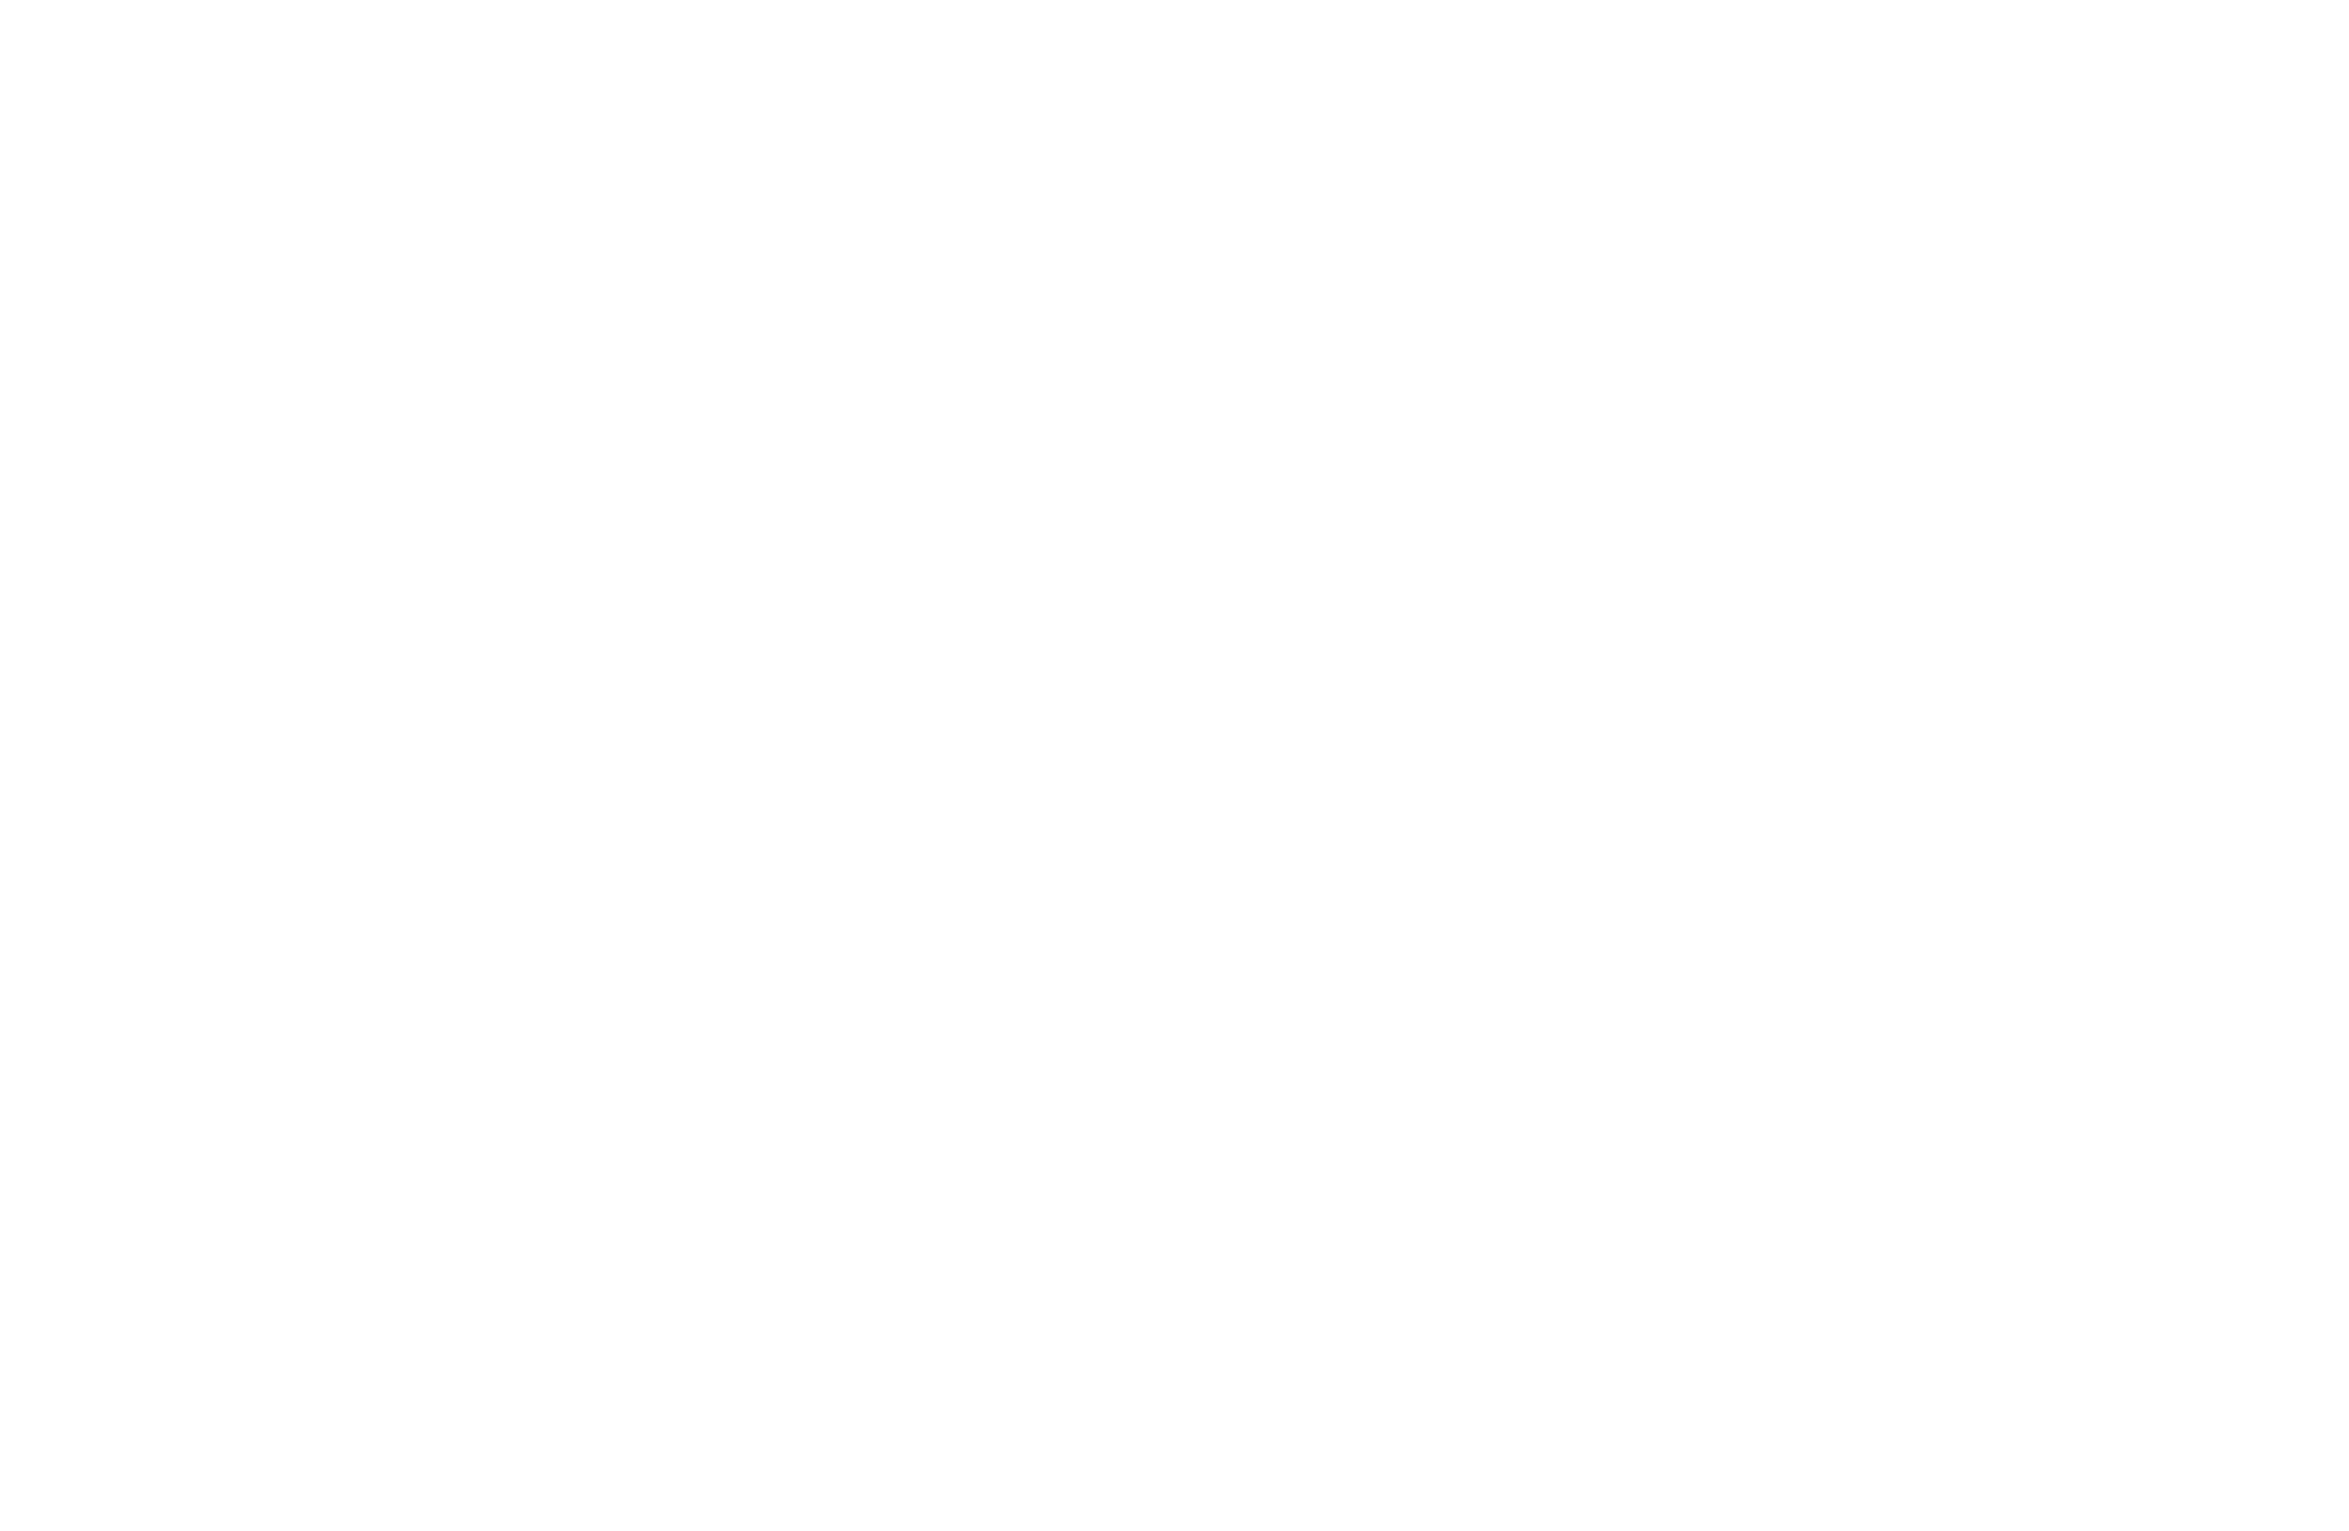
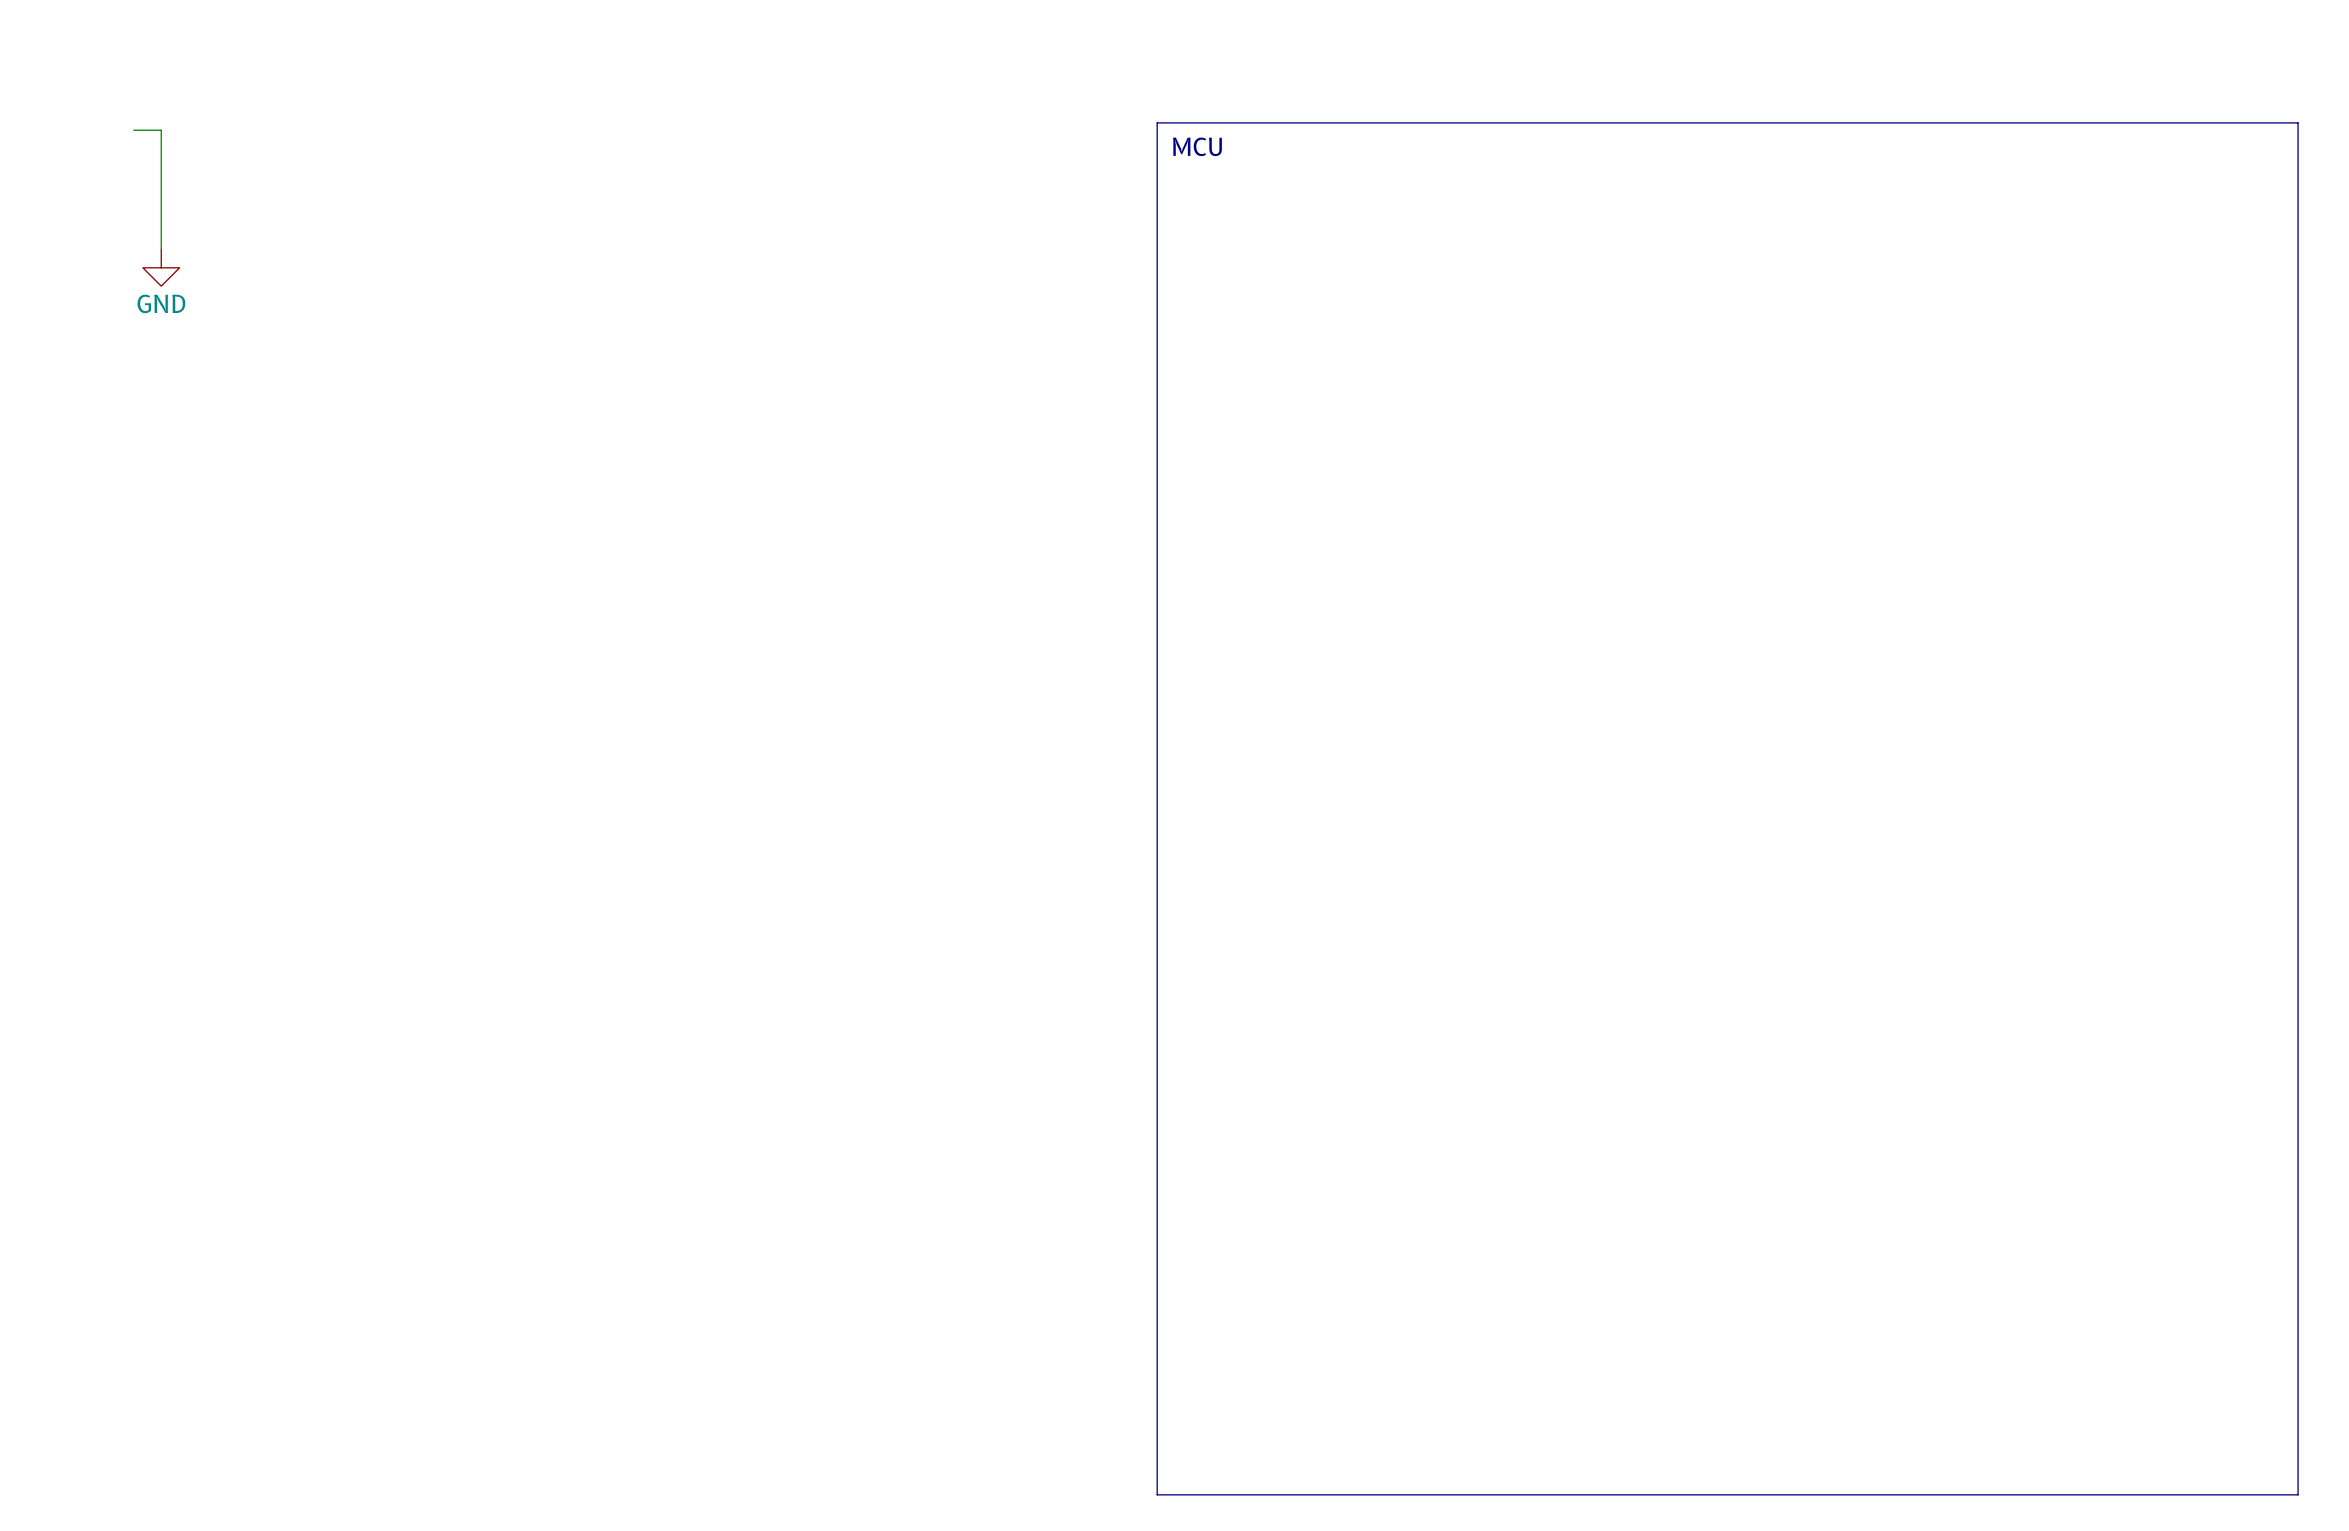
line: none -> (1157, 122) (2298, 122) (2298, 1494) (1157, 1494) (1157, 122)
wire: none -> (133, 130) (161, 130) (161, 249)
text: none -> MCU (1197, 146)
power symbol: none -> GND (161, 267)

